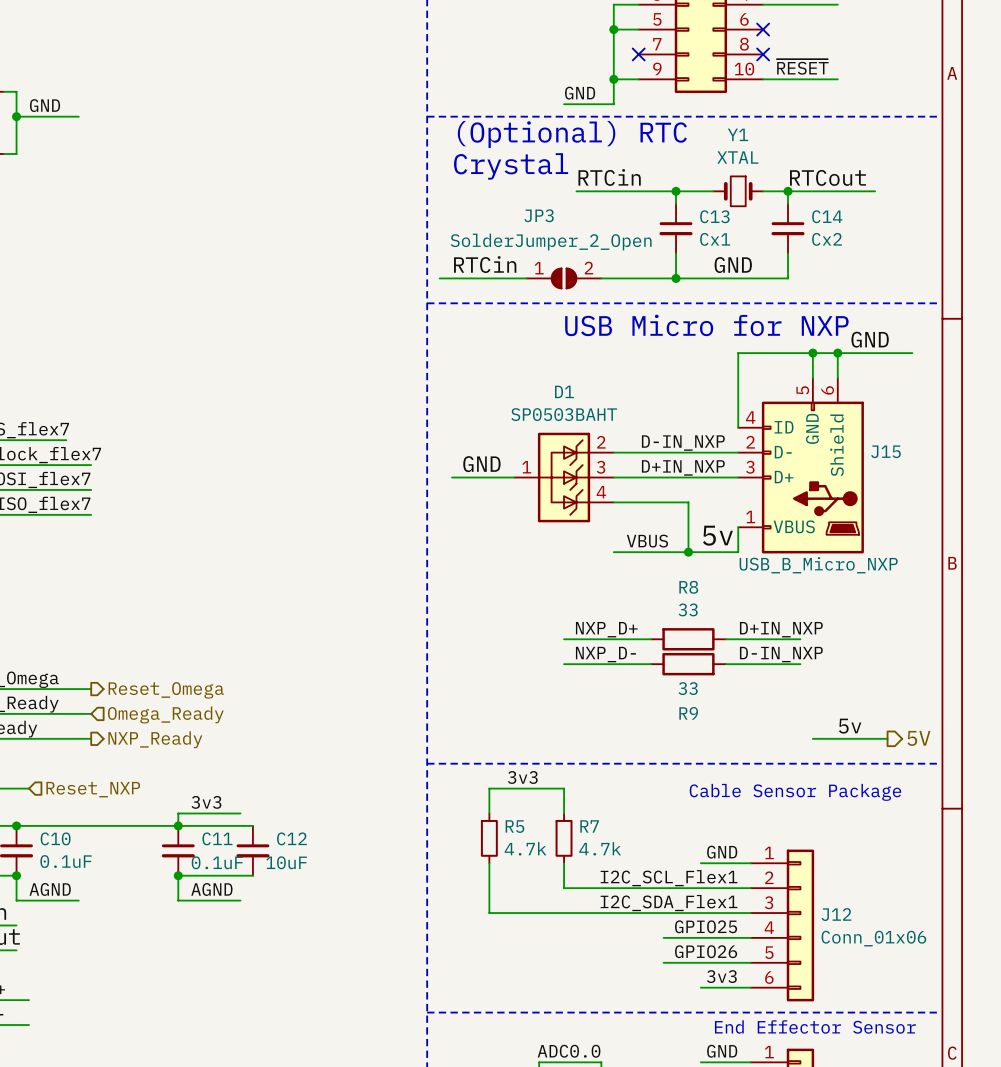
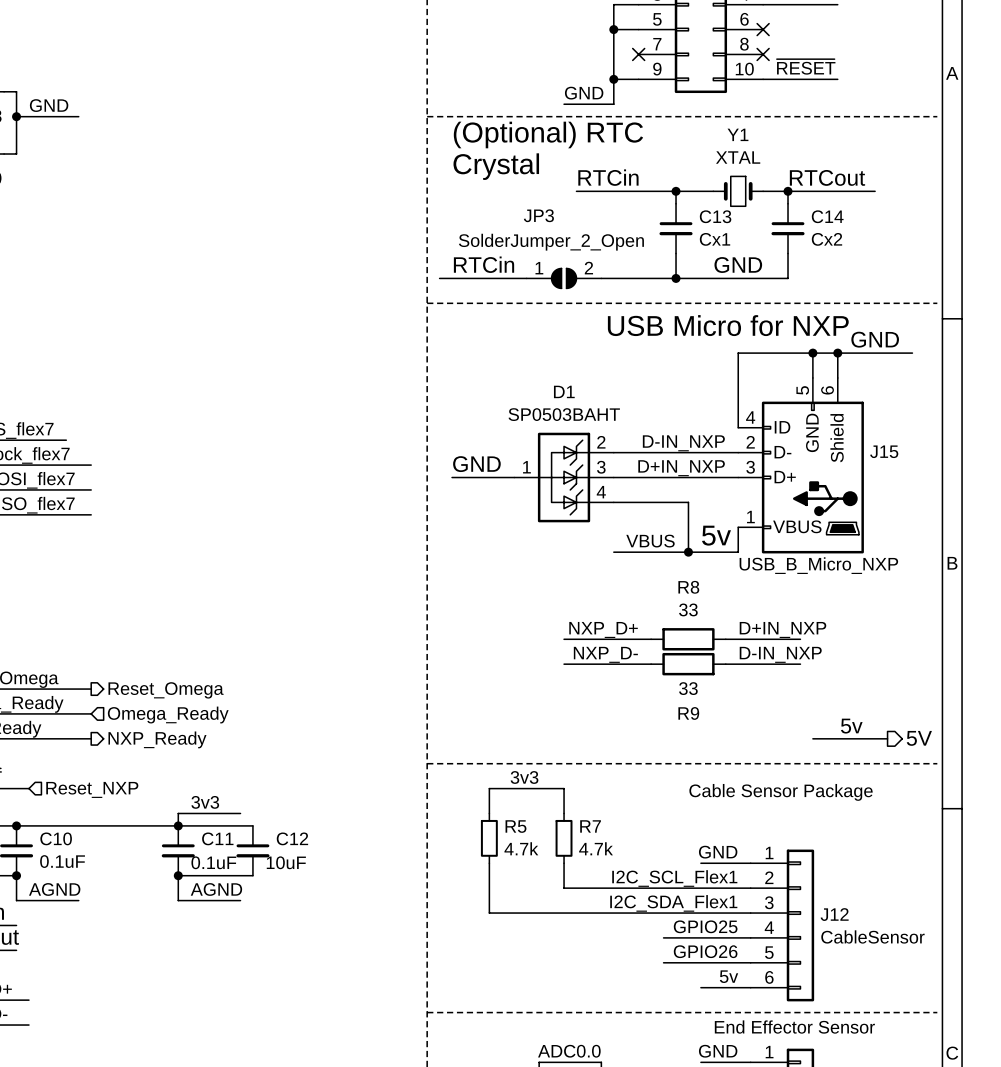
J12 value: Conn_01x06 (873, 938) -> CableSensor (872, 936)
label: 3v3 (721, 976) -> 5v (729, 976)

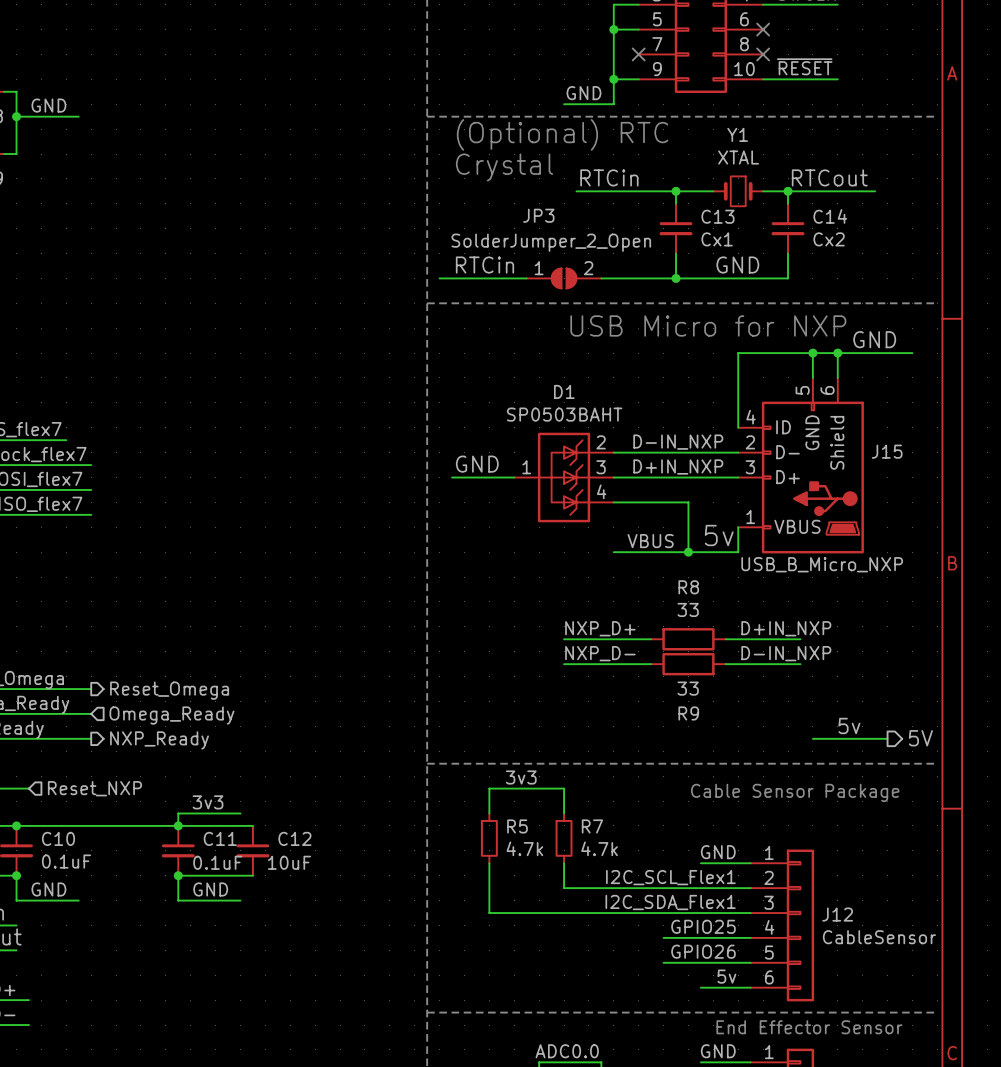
label: AGND (54, 889) -> GND (48, 889)
label: AGND (216, 889) -> GND (210, 889)

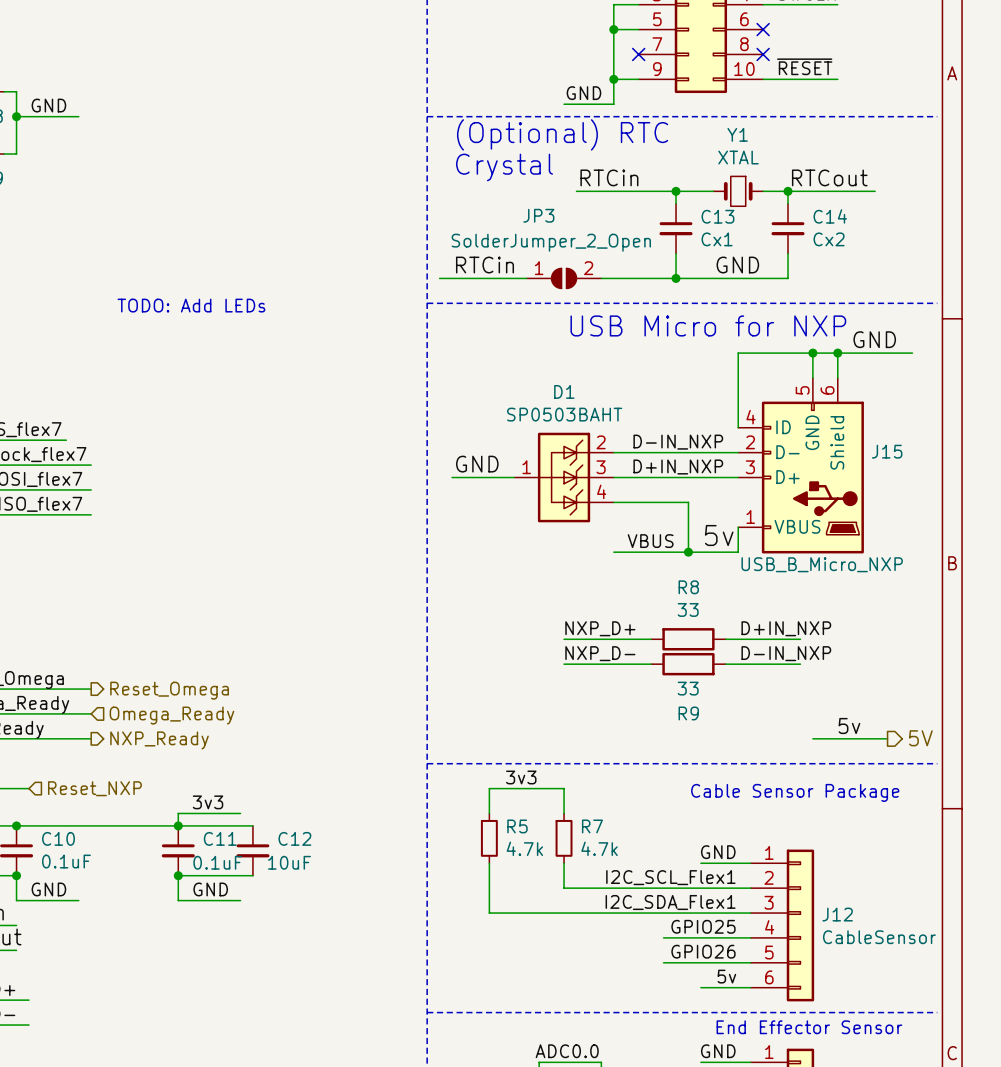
text: none -> TODO: Add LEDs (191, 305)

